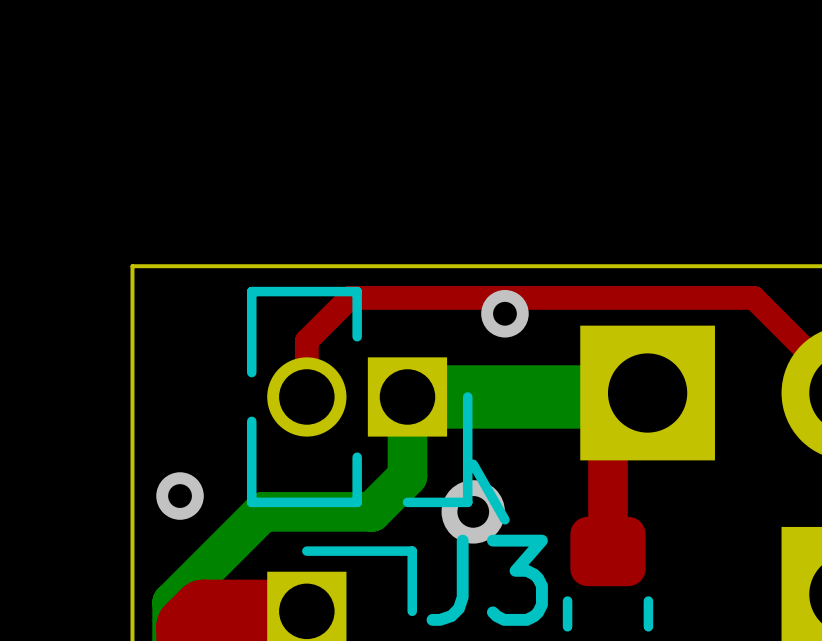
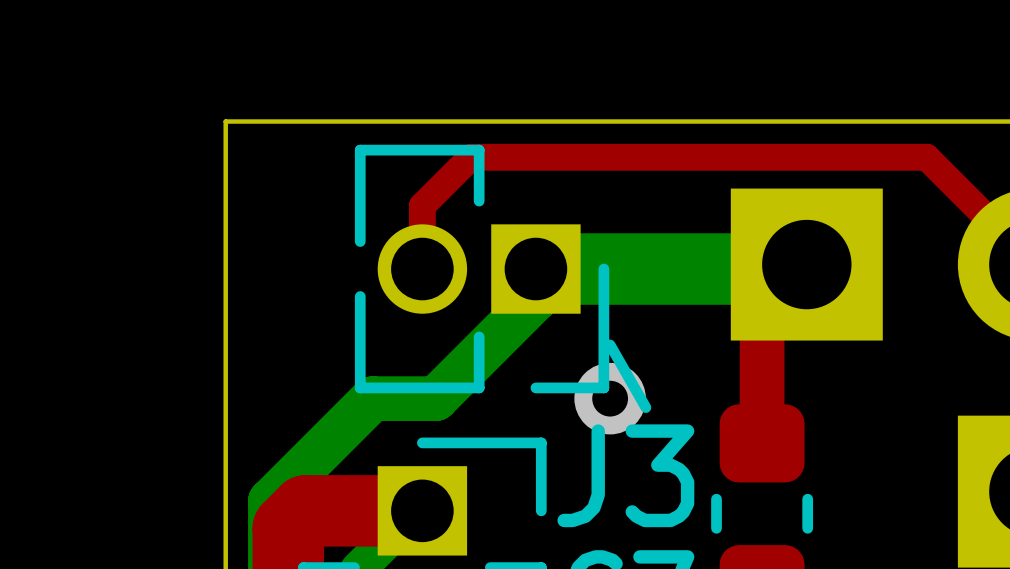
via: (504, 313) -> none
bottom track: (407, 423) (407, 476) (371, 511) (318, 511) -> (535, 298) (435, 398)
via: (180, 496) -> none

